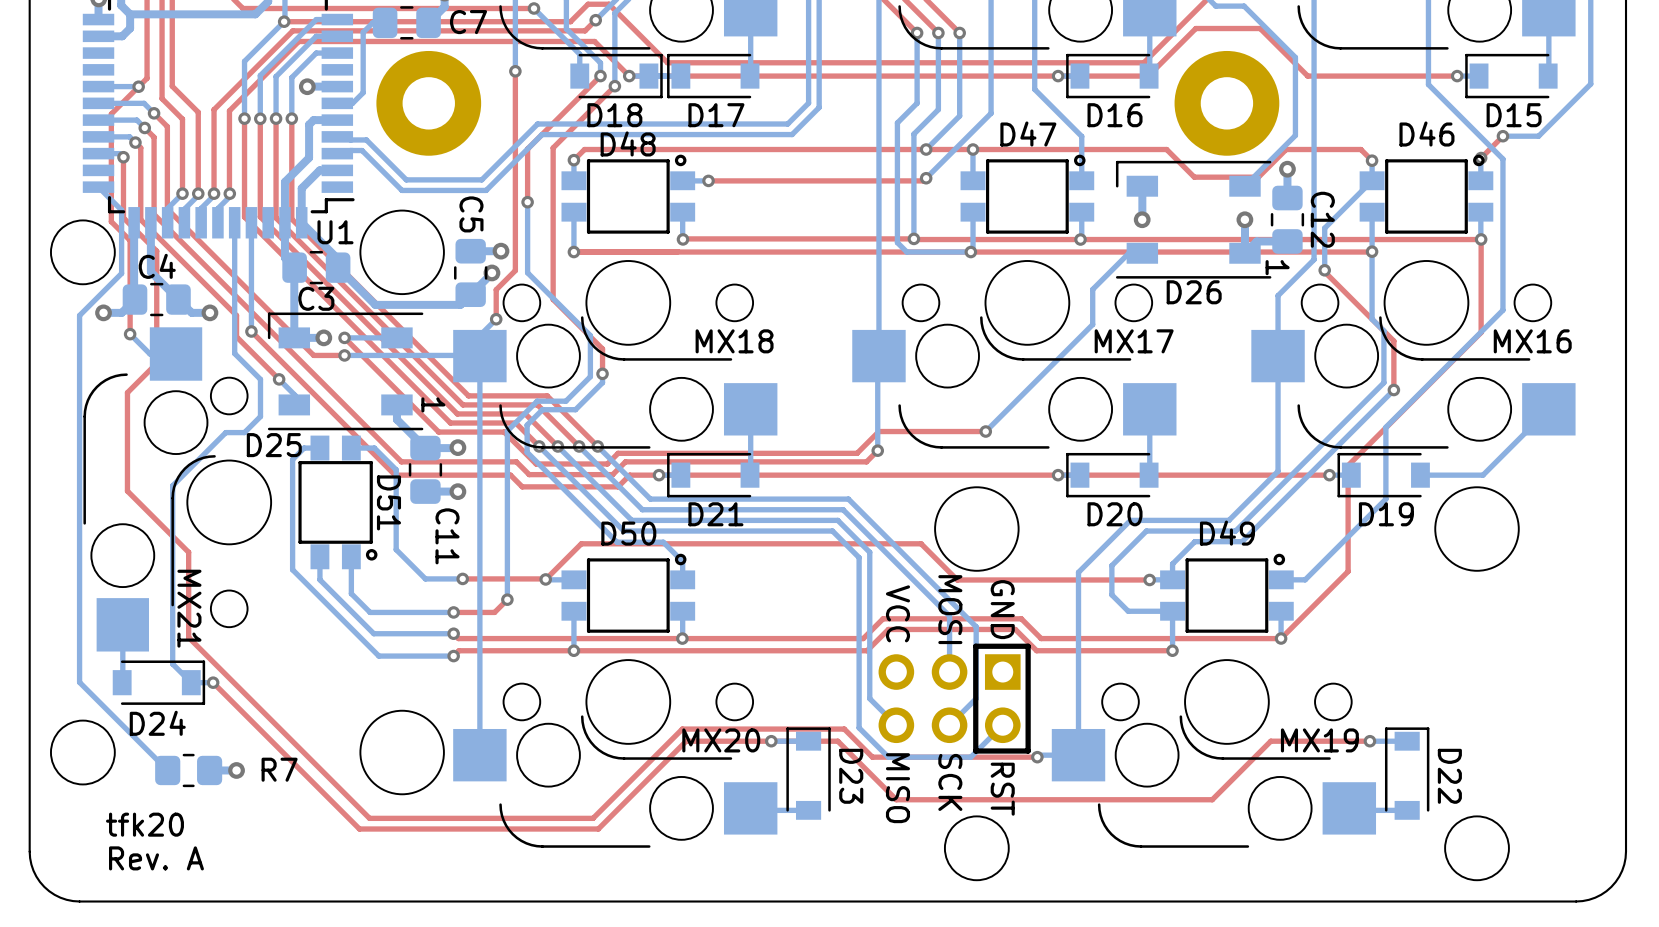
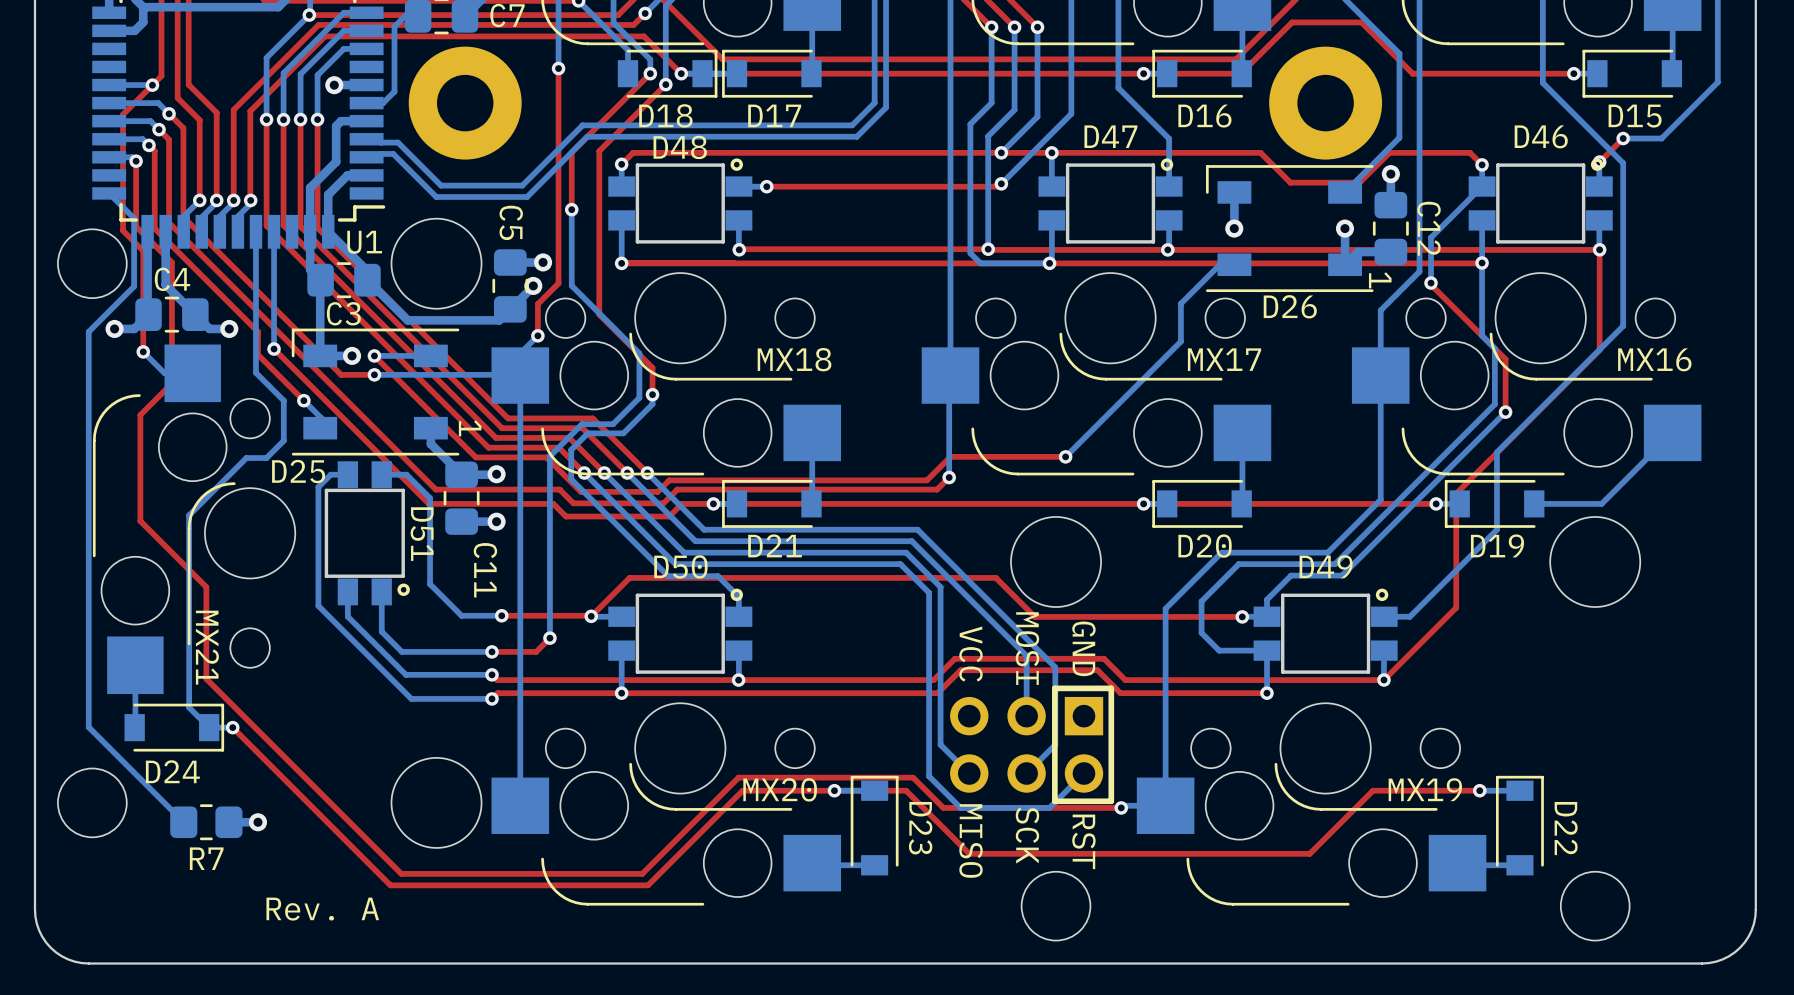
R7 name position: R7 (279, 769) -> R7 (206, 858)
text: tfk20 (144, 824) -> none
text position: Rev. A (156, 858) -> Rev. A (322, 909)

